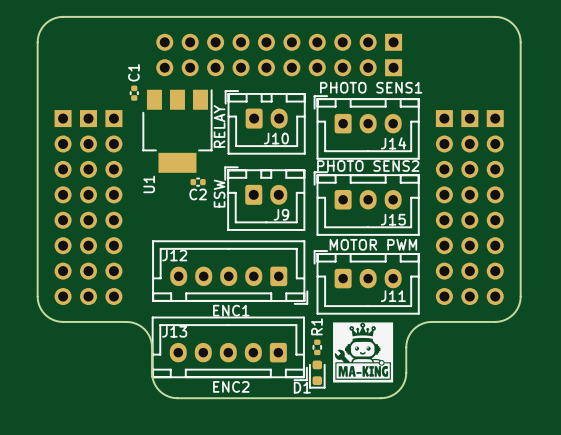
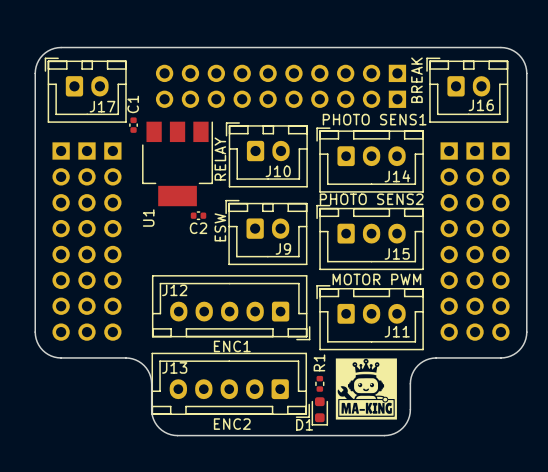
text: none -> BREAK (416, 80)
J17: none -> (85, 90)
J16: none -> (467, 90)

